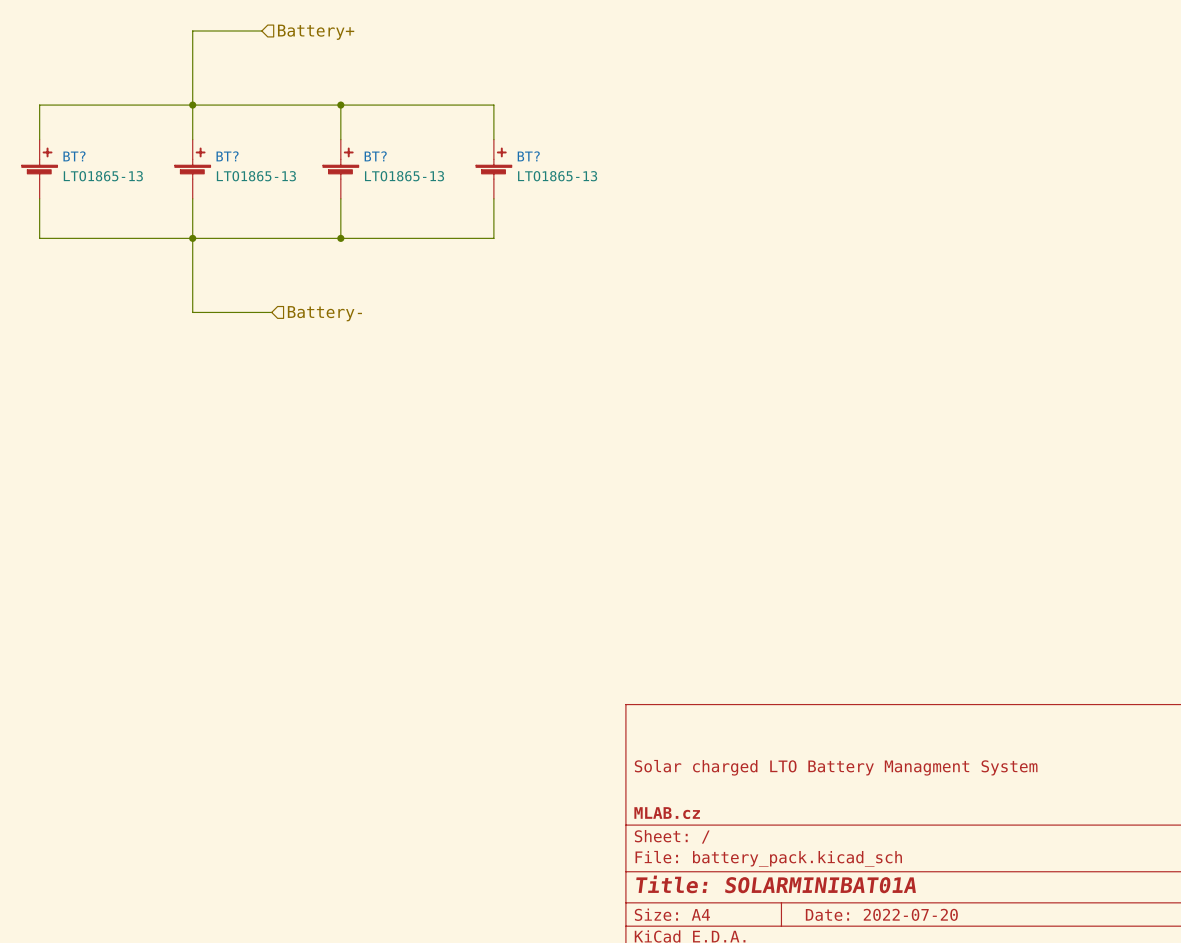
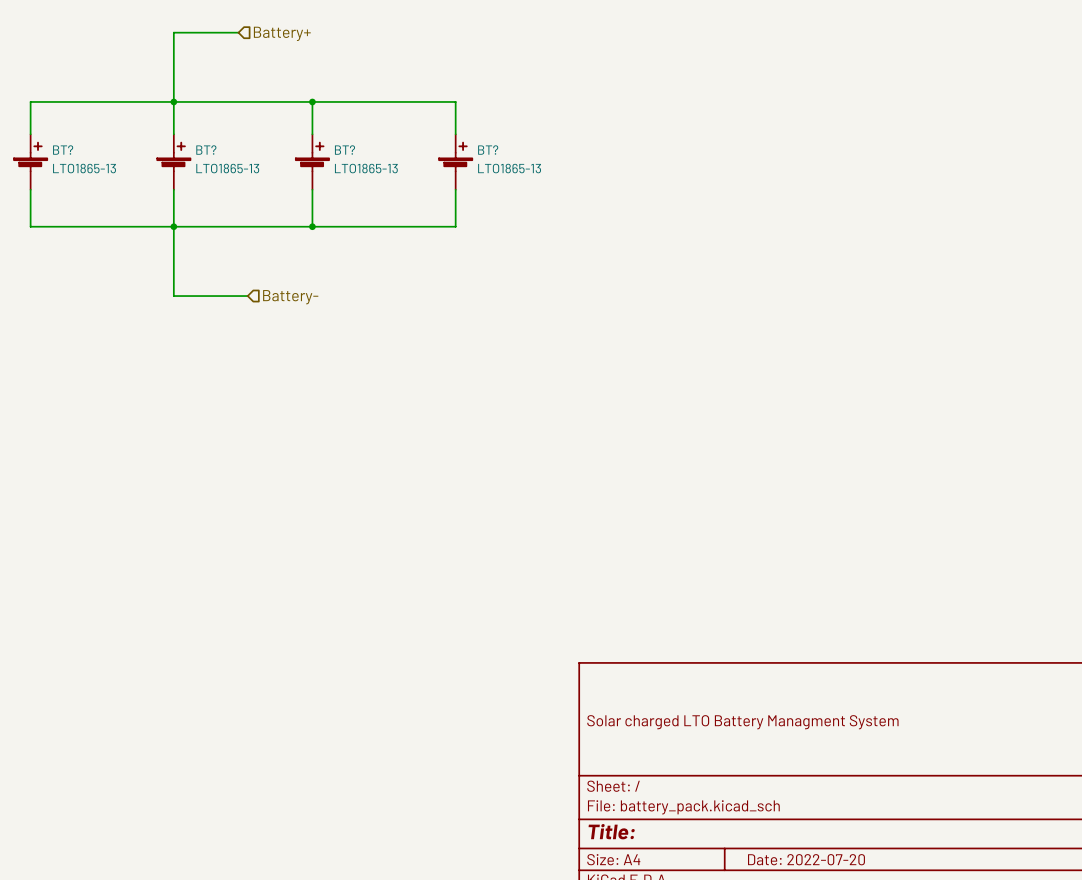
title block: MLAB.cz (667, 813) -> none
title block: Title: SOLARMINIBAT01A (776, 884) -> Title: (611, 831)

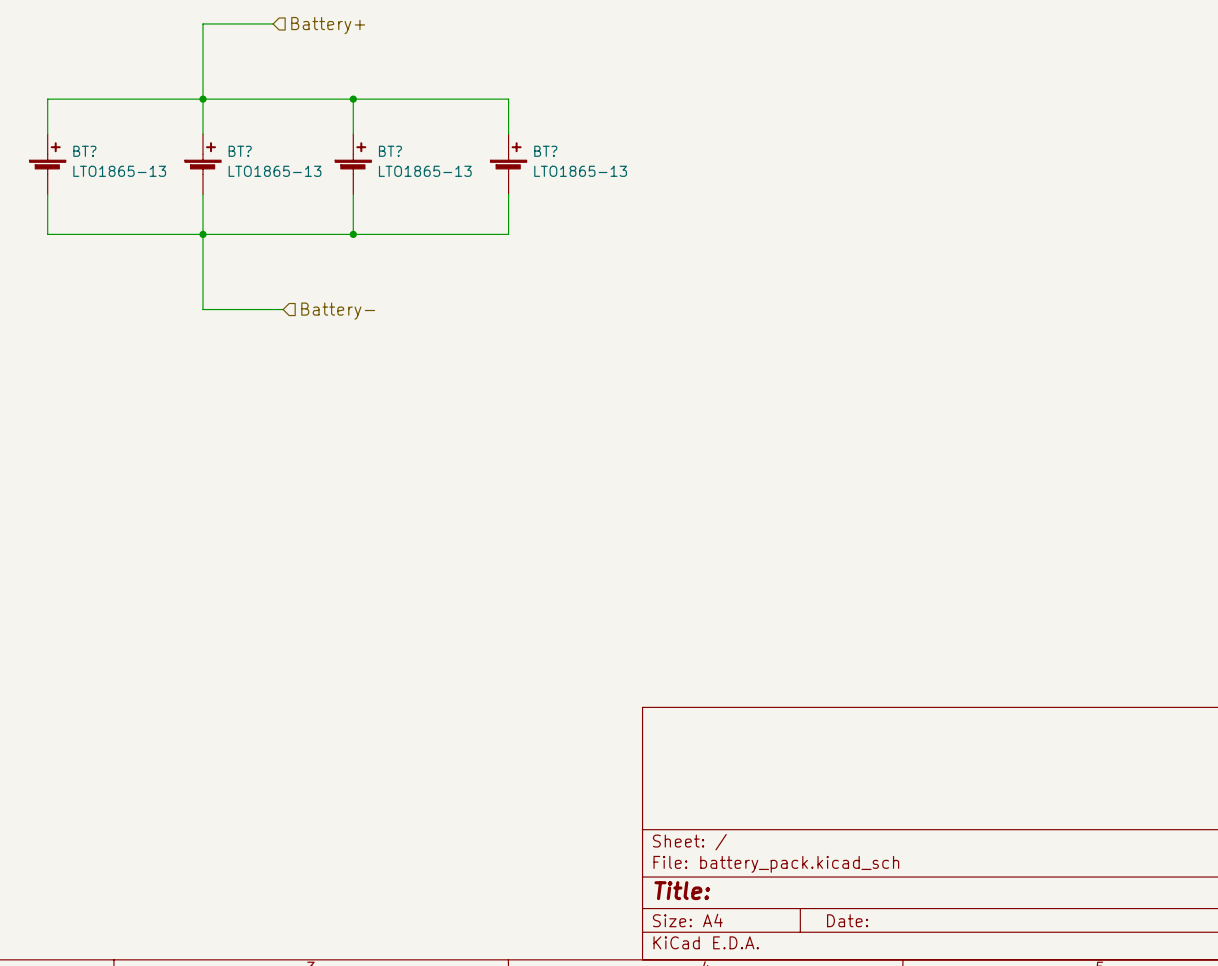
title block: Solar charged LTO Battery Managment System (742, 722) -> none
title block: Date: 2022-07-20 (806, 859) -> Date: (847, 920)

